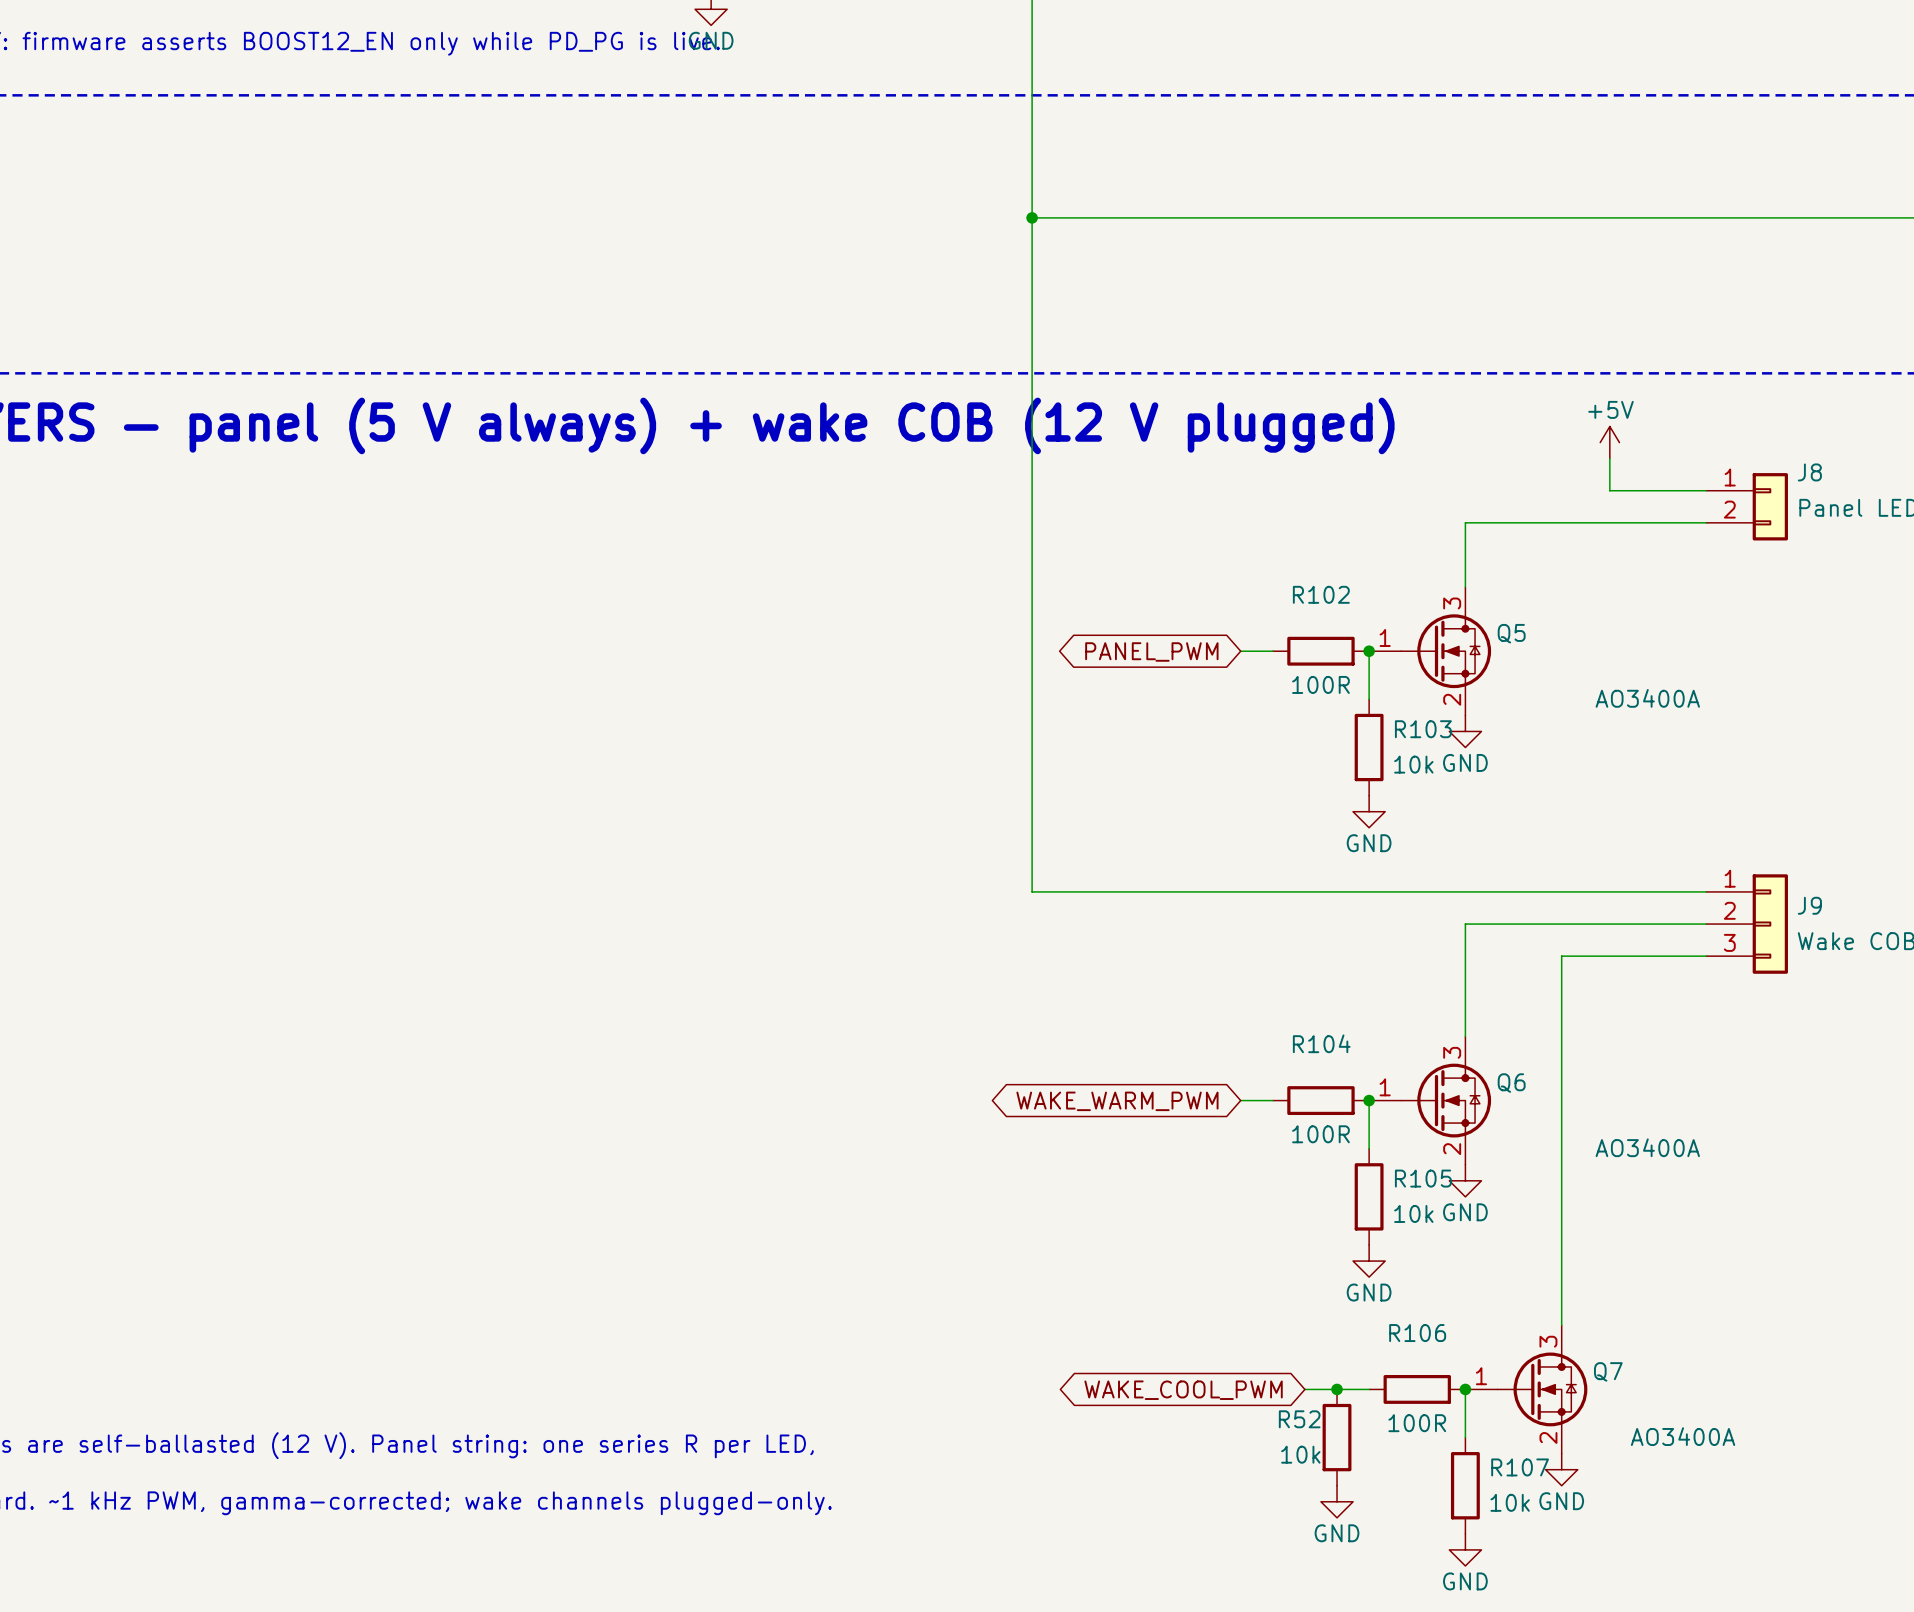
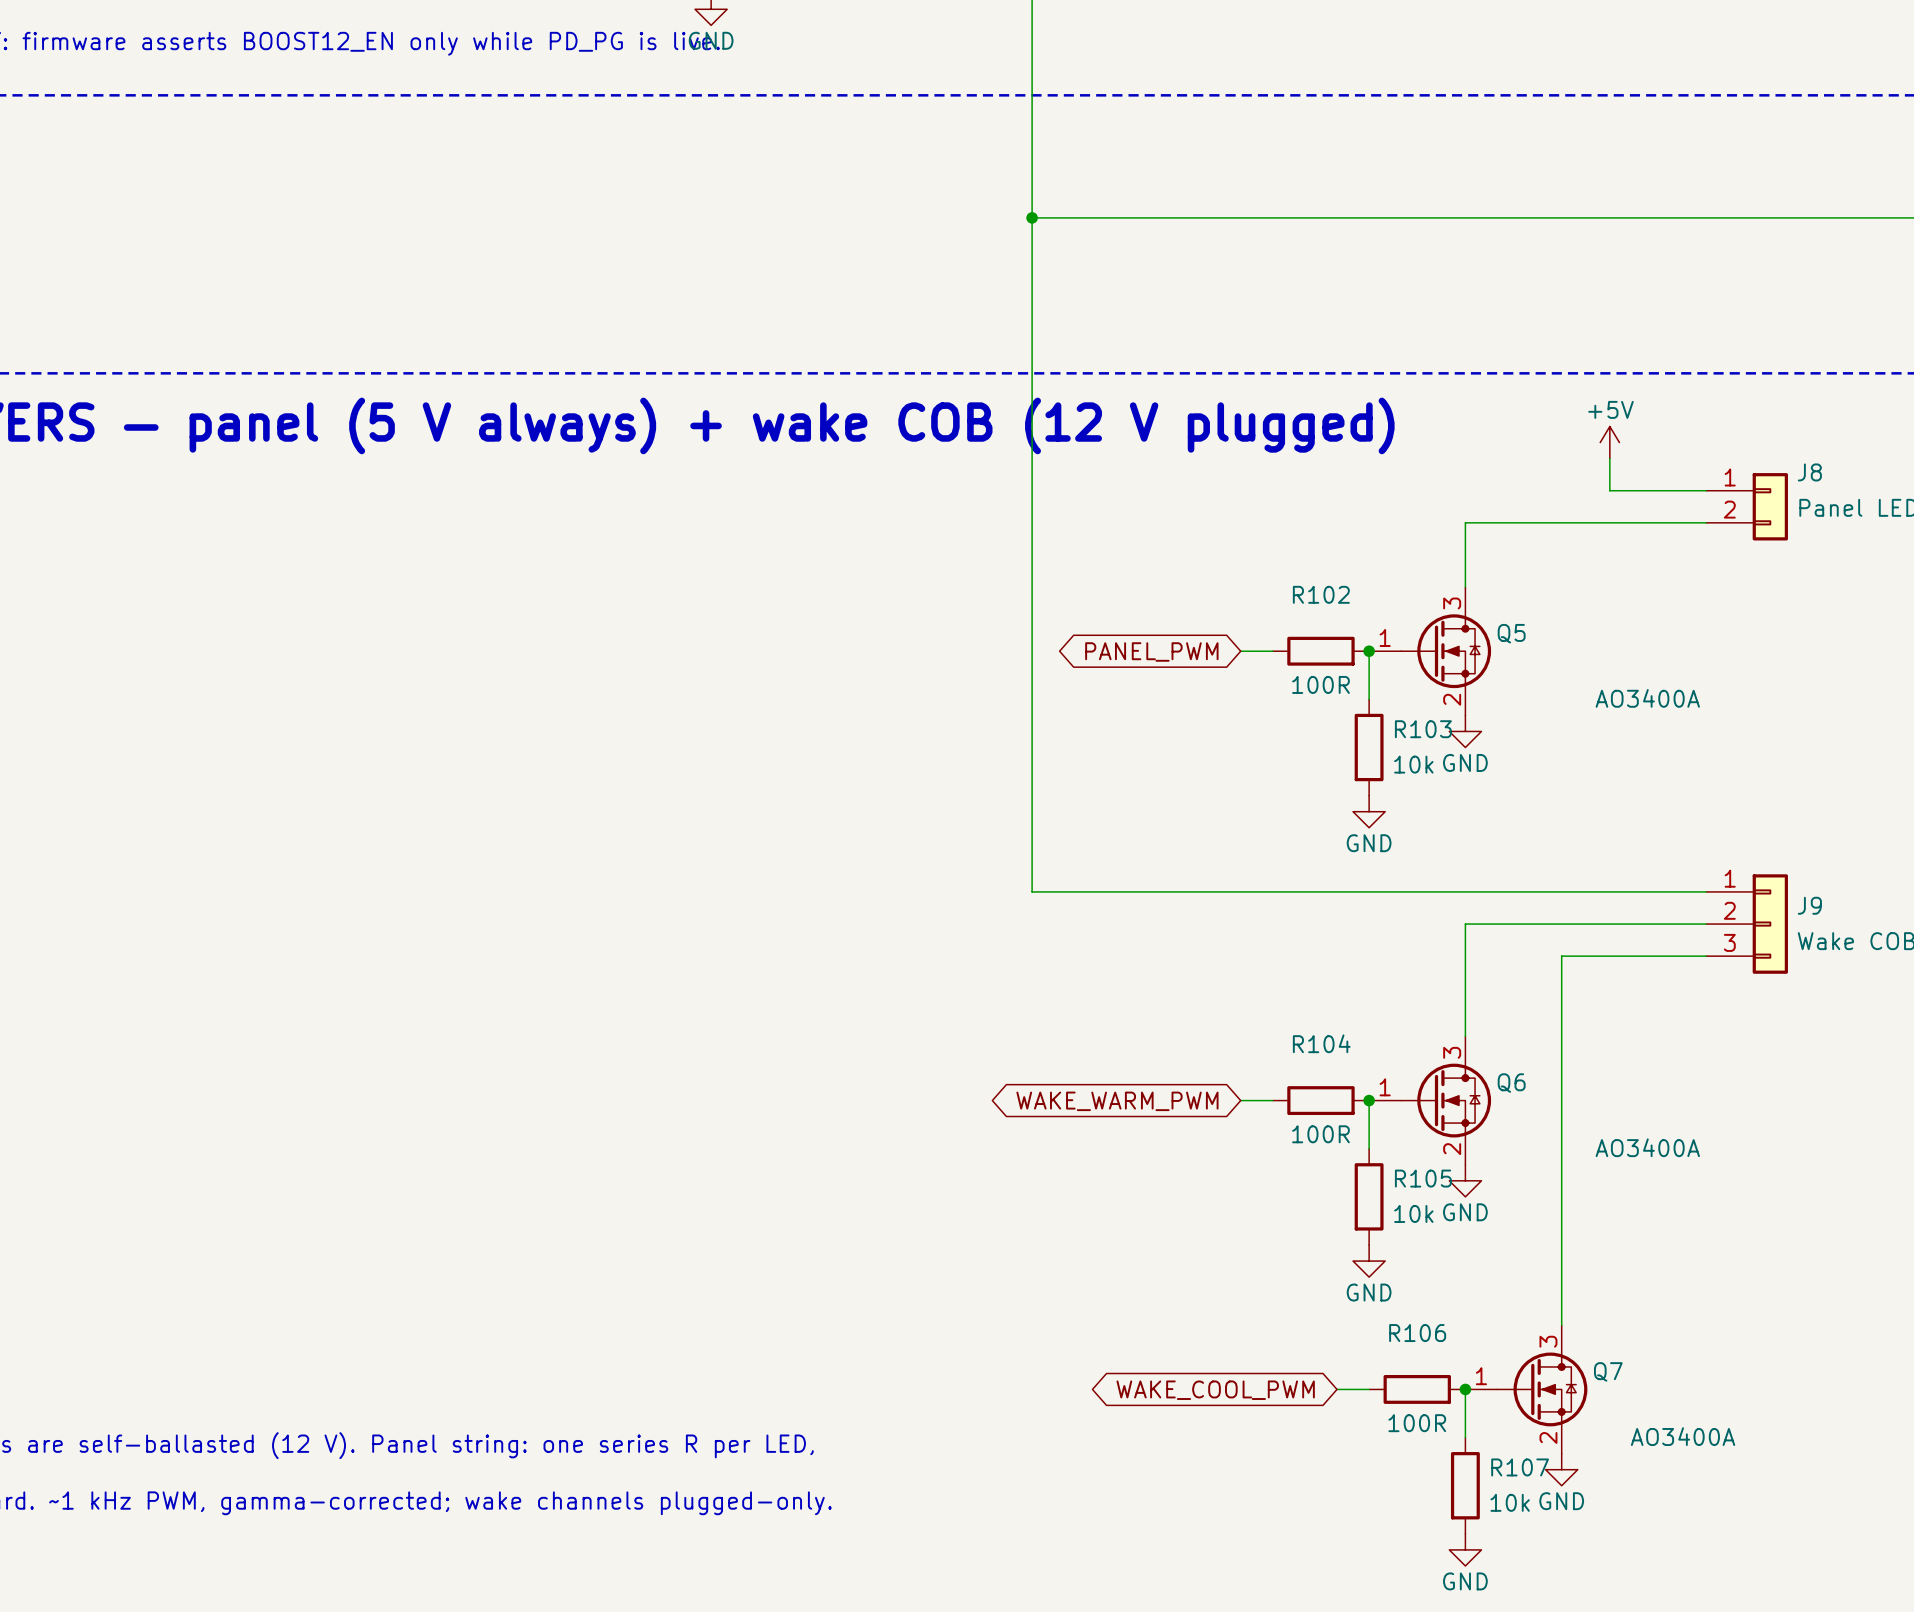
wire: (1304, 1389) (1337, 1389) -> none
junction: (1337, 1389) -> none
global label position: WAKE_COOL_PWM (1183, 1390) -> WAKE_COOL_PWM (1215, 1390)
R52: 10k (1337, 1437) -> none
power symbol: GND (1337, 1501) -> none

